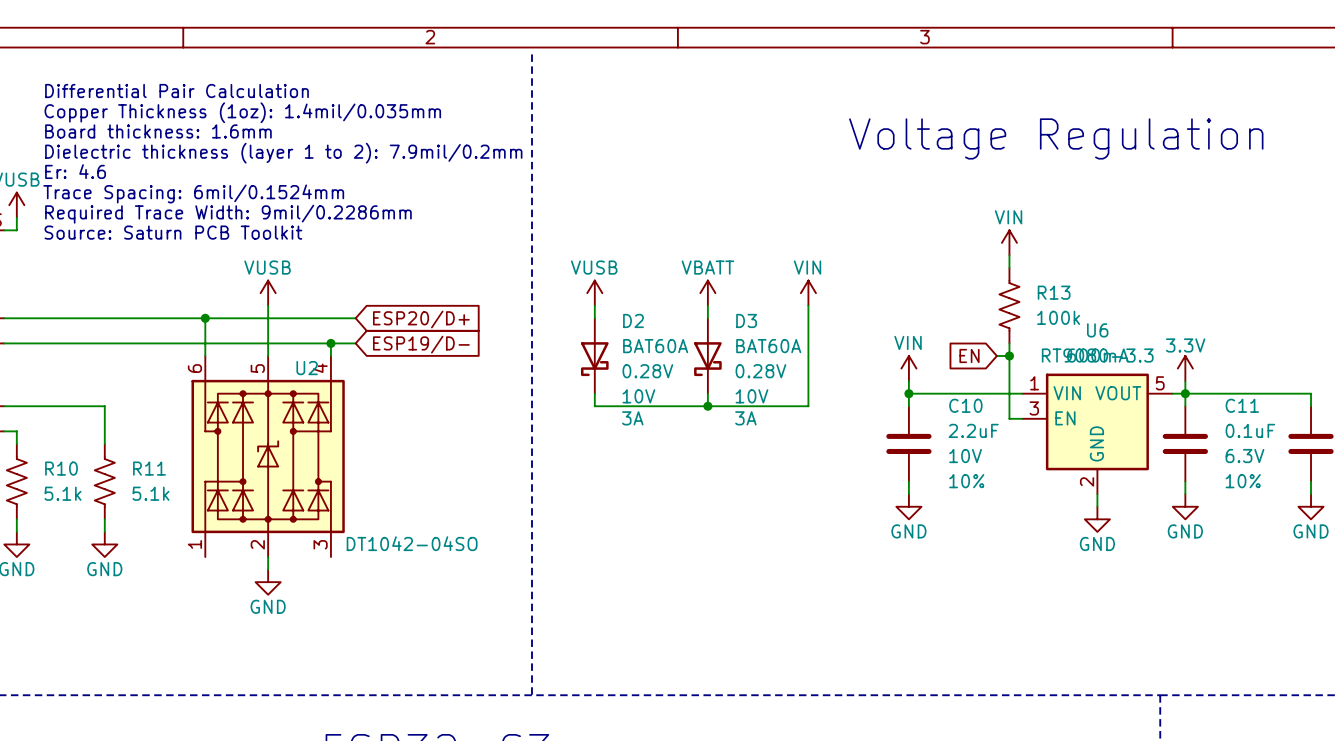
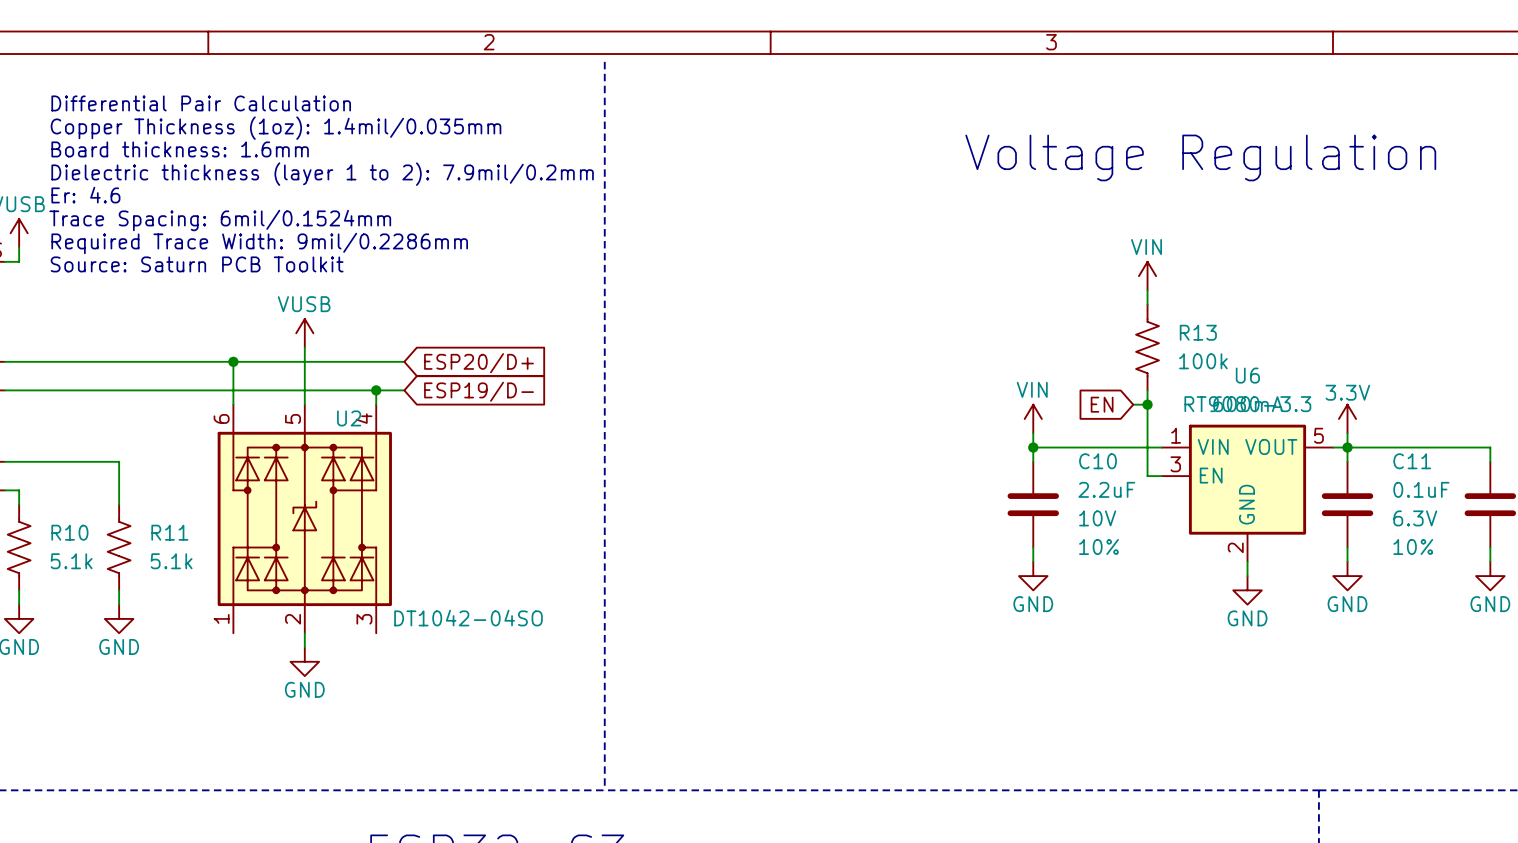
power symbol: VUSB (594, 293) -> none
power symbol: VBATT (707, 293) -> none
power symbol: VIN (808, 293) -> none
wire: (594, 305) (594, 318) -> none
wire: (707, 305) (707, 318) -> none
wire: (808, 305) (808, 406) (594, 406) (594, 393) -> none
D2: BAT60A (594, 355) -> none
D3: BAT60A (707, 355) -> none
wire: (707, 393) (707, 406) -> none
junction: (707, 406) -> none

